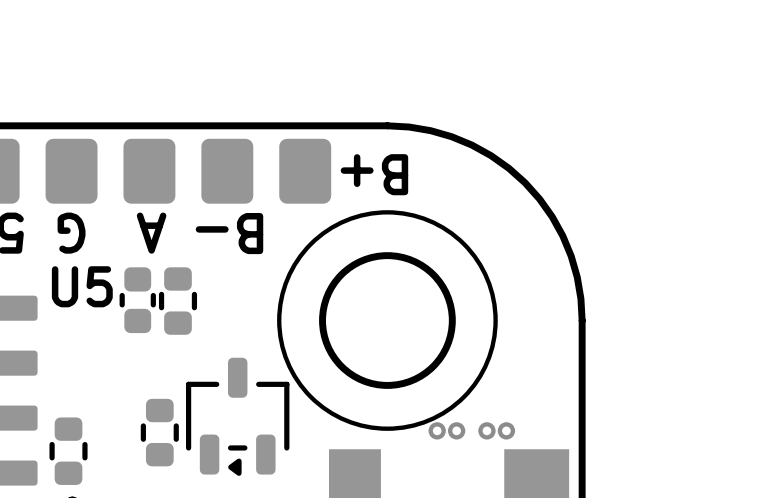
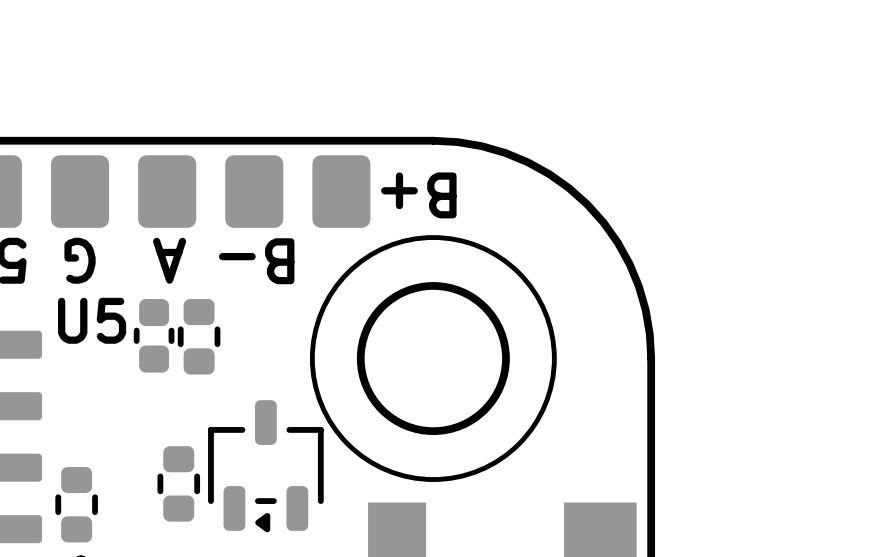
via: (437, 430) -> none
via: (456, 430) -> none
via: (486, 430) -> none
via: (506, 430) -> none

